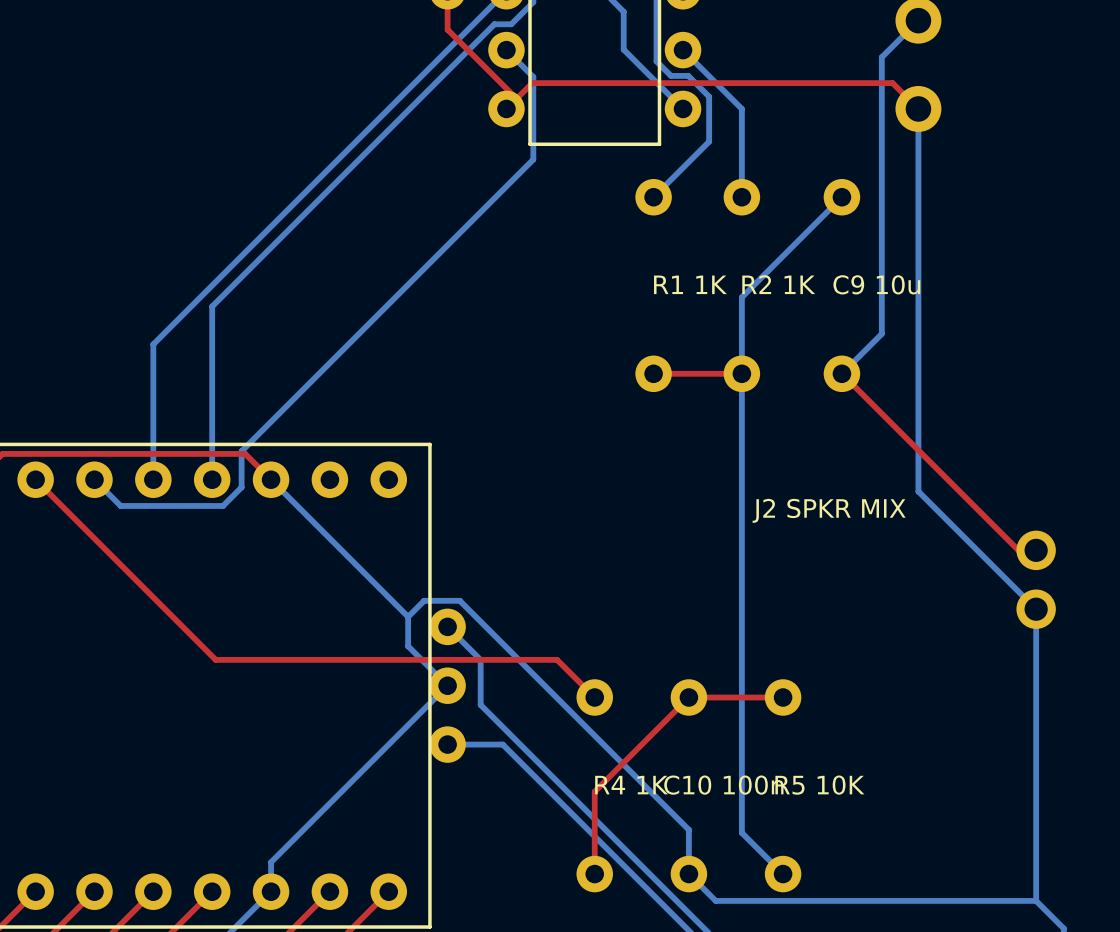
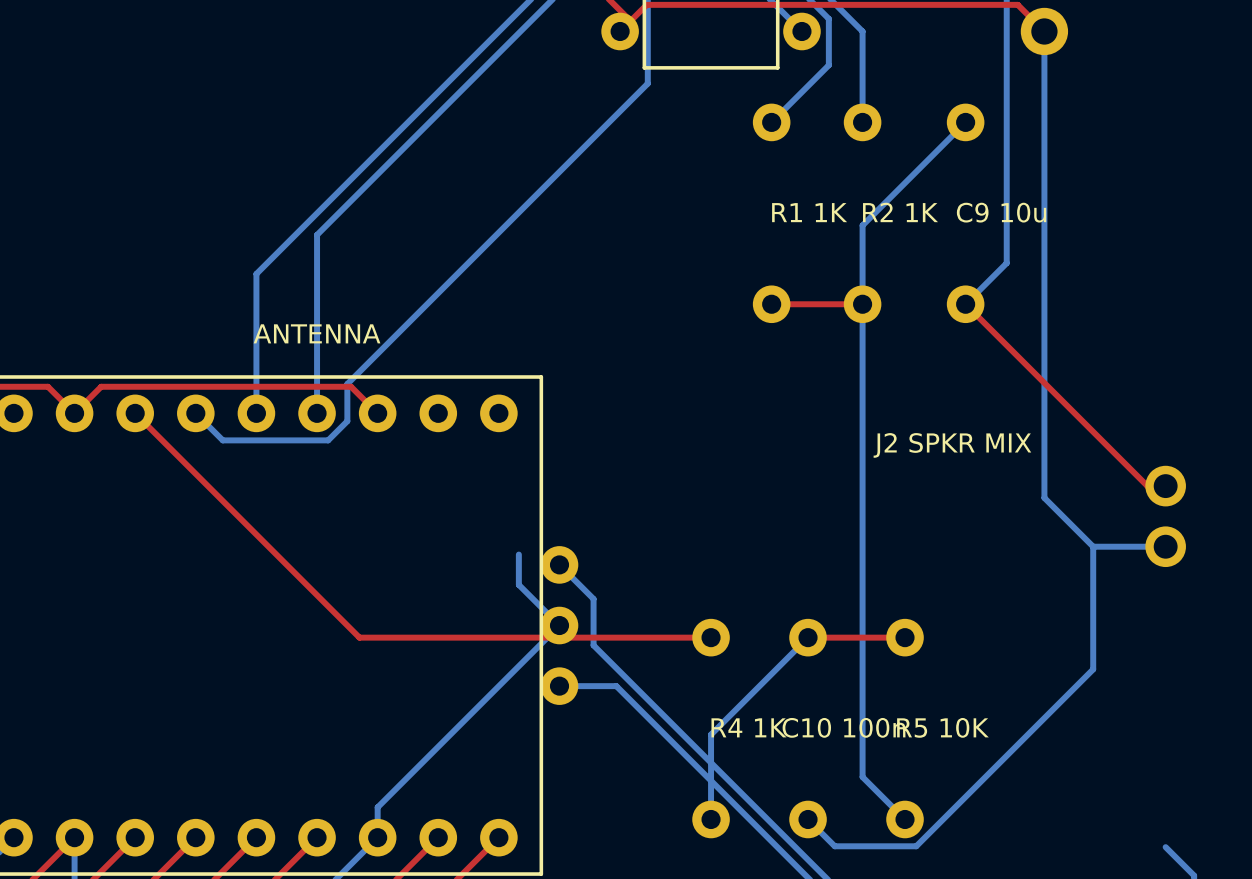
text: none -> ANTENNA (317, 333)
bottom track: (271, 479) (408, 616) (424, 600) (459, 600) (688, 829) (688, 874) -> none
bottom track: (918, 491) (1036, 609) (1036, 900) (714, 900) -> (1093, 546) (1093, 669) (916, 846) (834, 846)
bottom track: none -> (1044, 425) (1044, 497) (1093, 546)
bottom track: none -> (1093, 546) (1165, 546)
top track: (215, 659) (557, 659) (594, 697) -> (320, 598) (359, 637) (711, 637)
top track: (688, 697) (594, 791) (594, 874) -> none
bottom track: none -> (808, 637) (711, 734) (711, 819)

